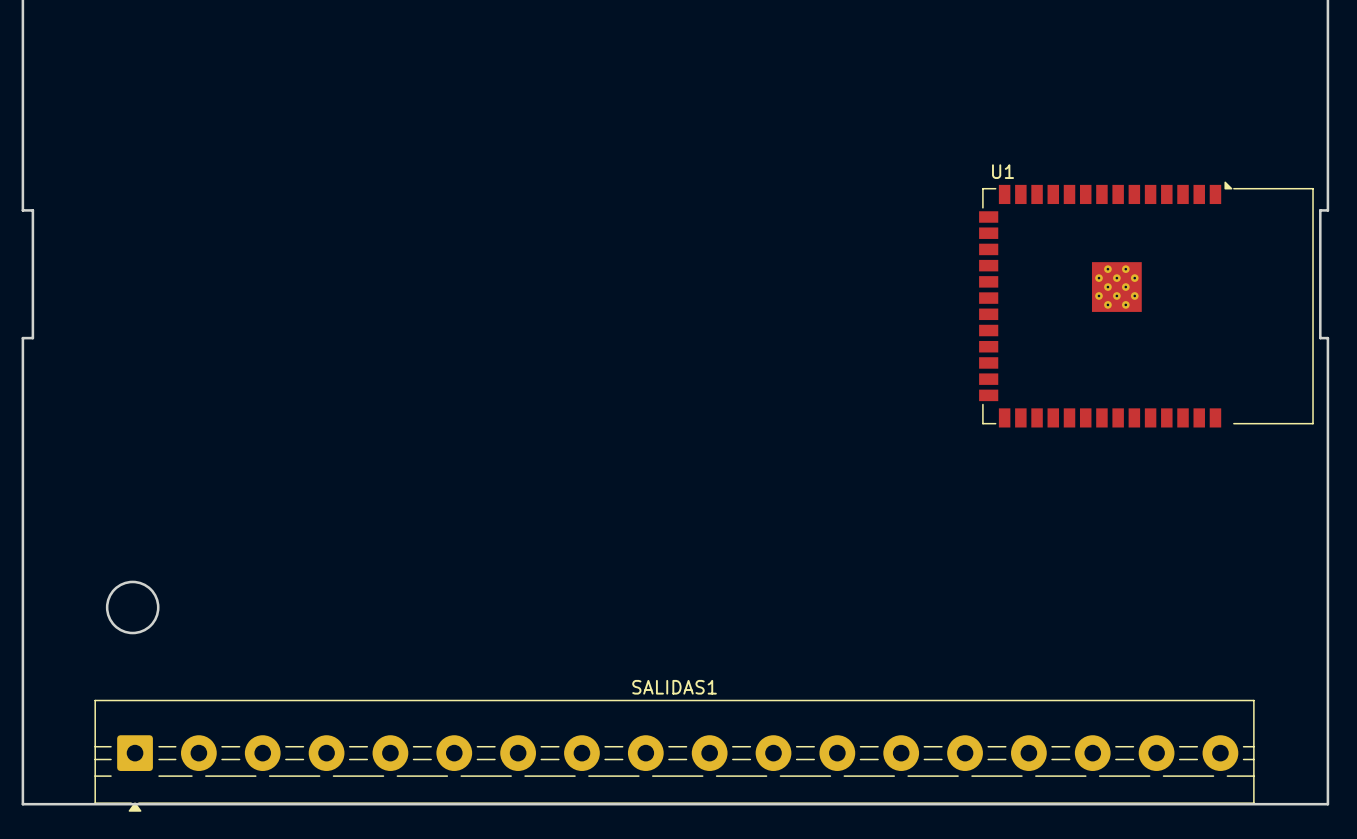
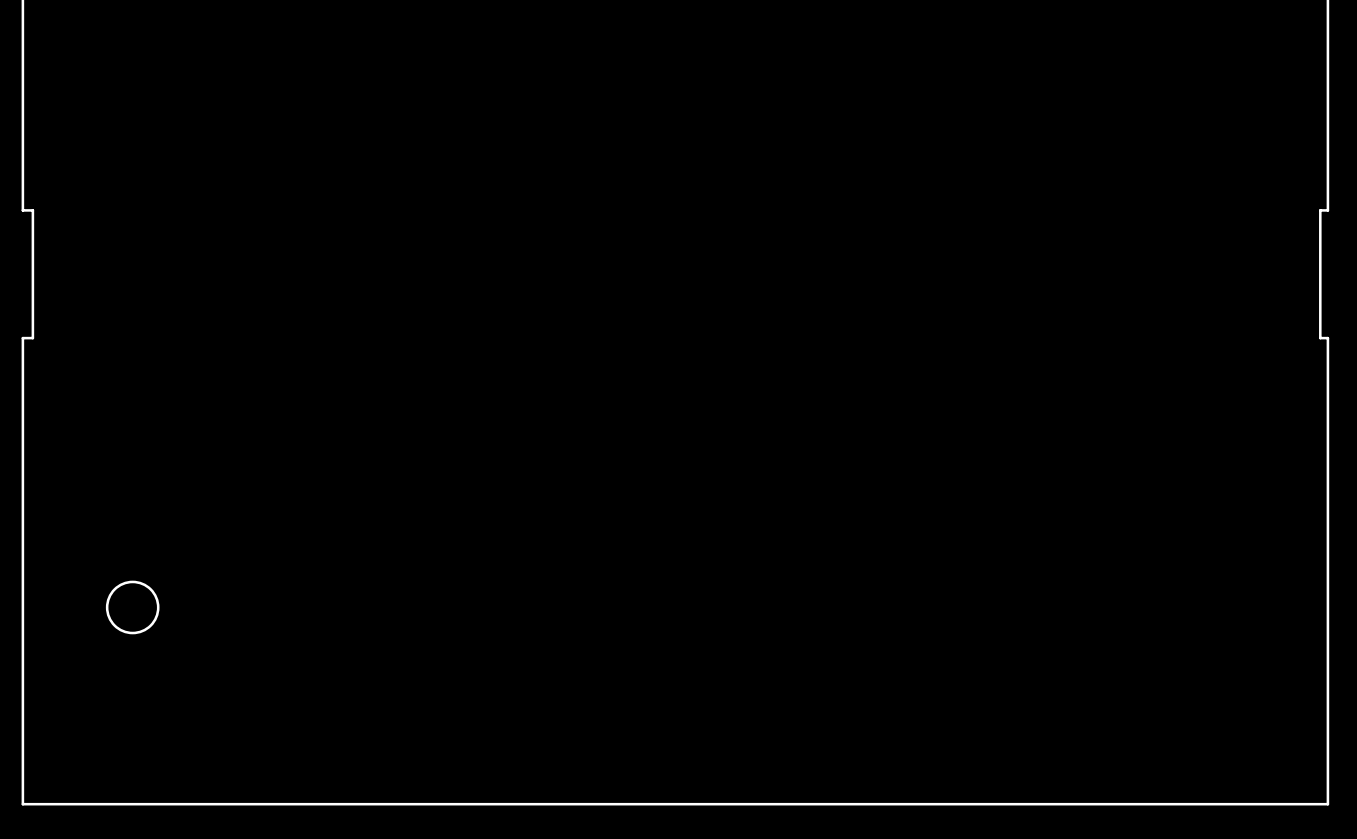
U1: (1146, 304) -> none
SALIDAS1: (674, 755) -> none

